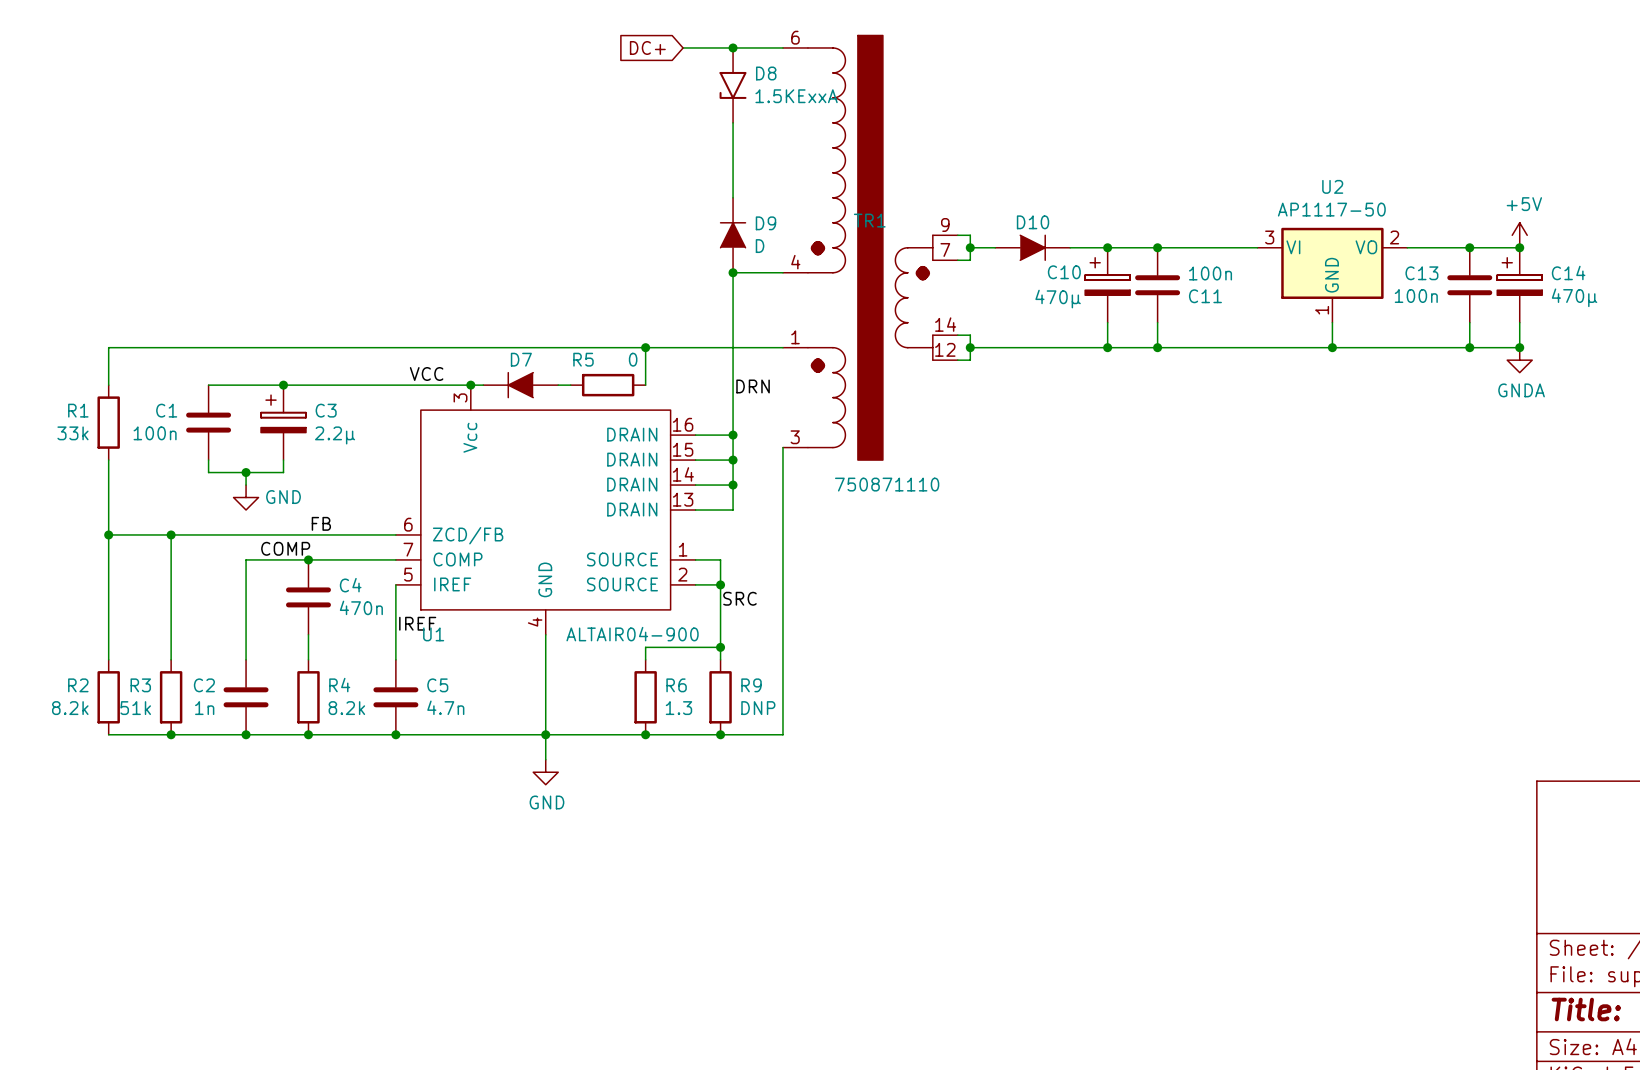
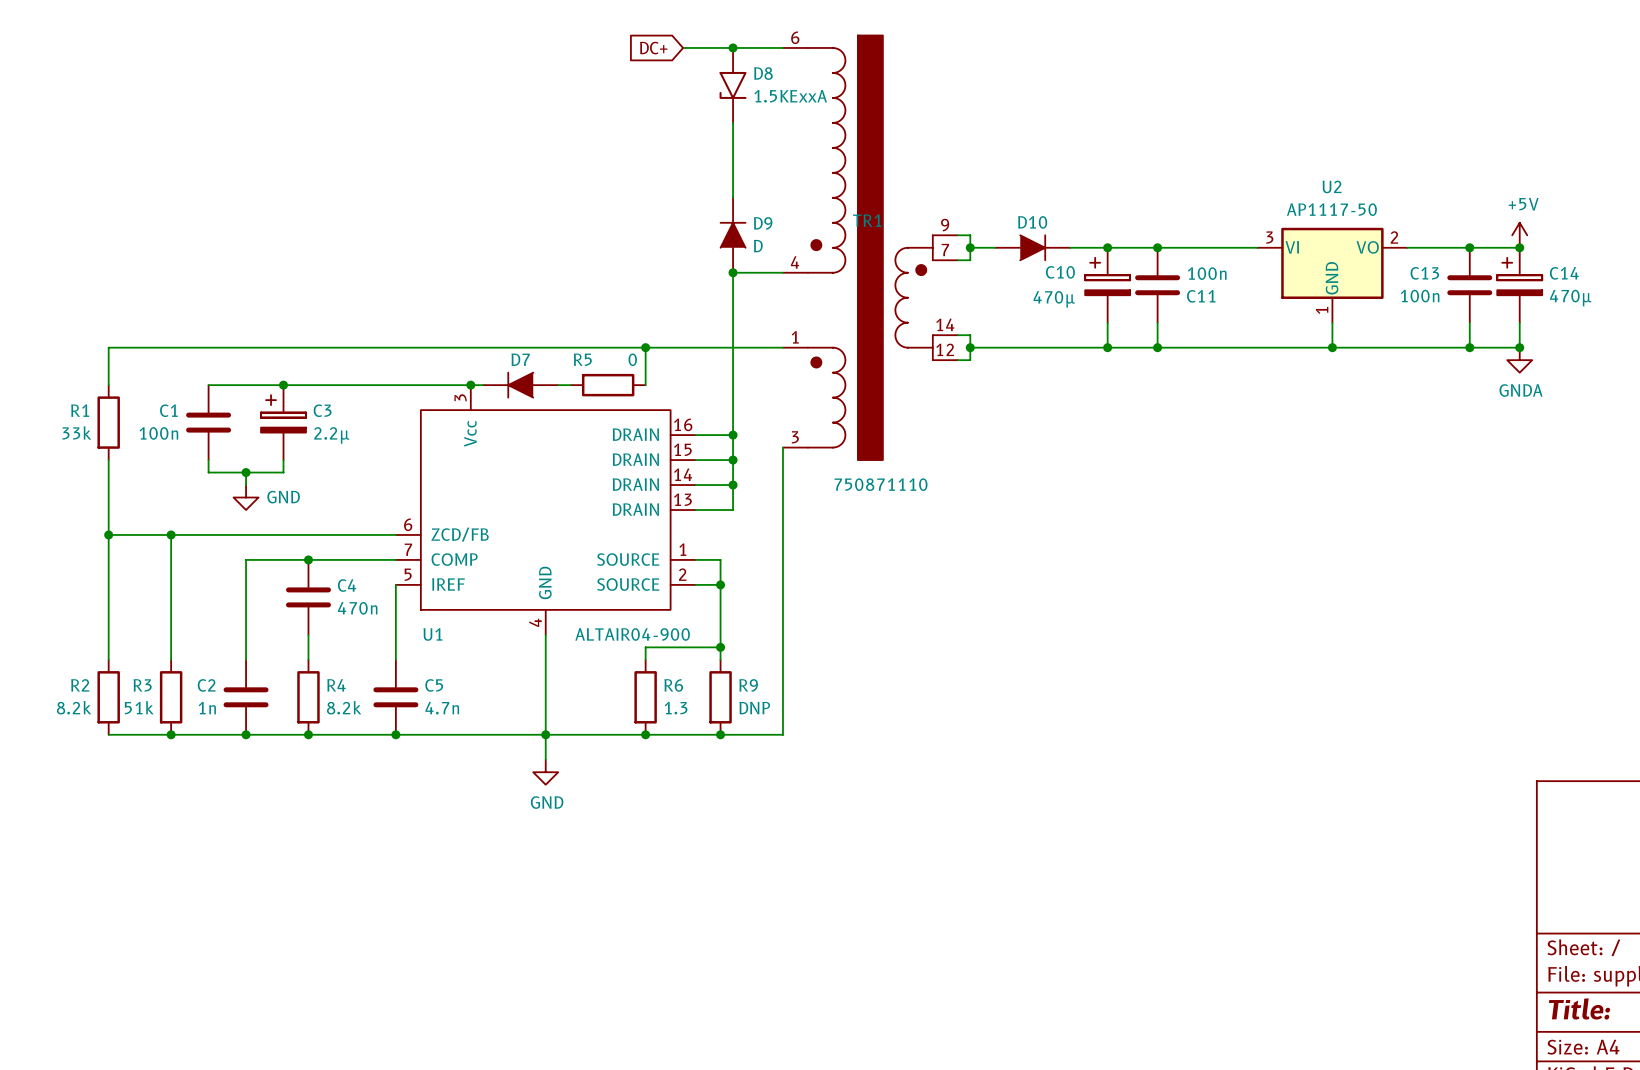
label: VCC (426, 373) -> none
label: DRN (753, 386) -> none
label: FB (321, 523) -> none
label: COMP (285, 548) -> none
label: SRC (739, 598) -> none
label: IREF (417, 623) -> none

